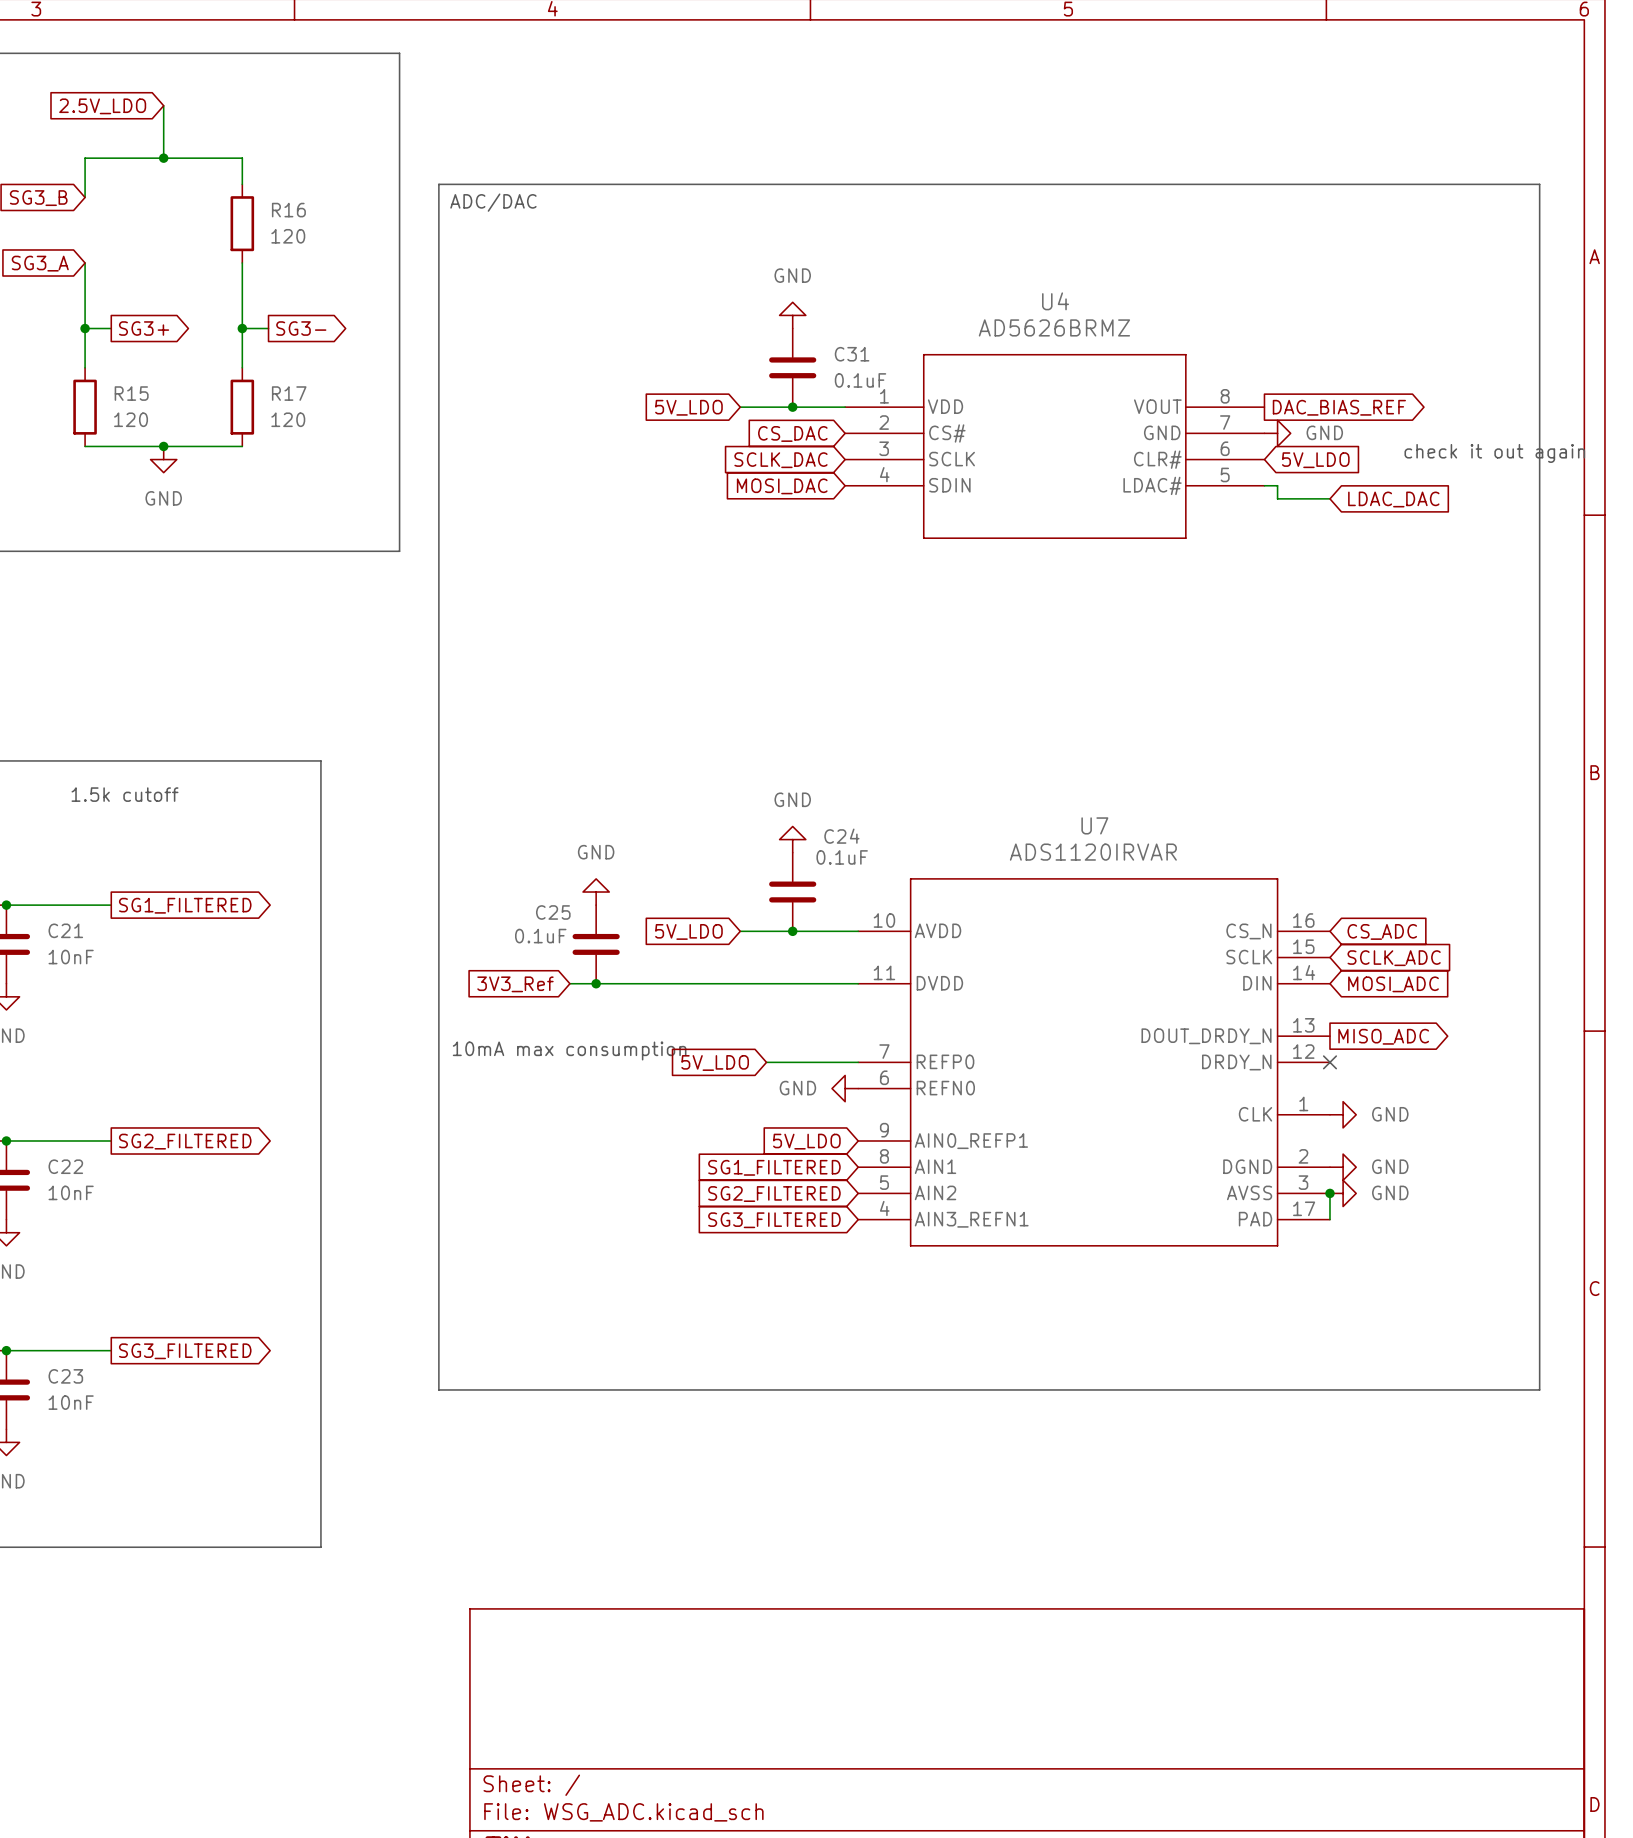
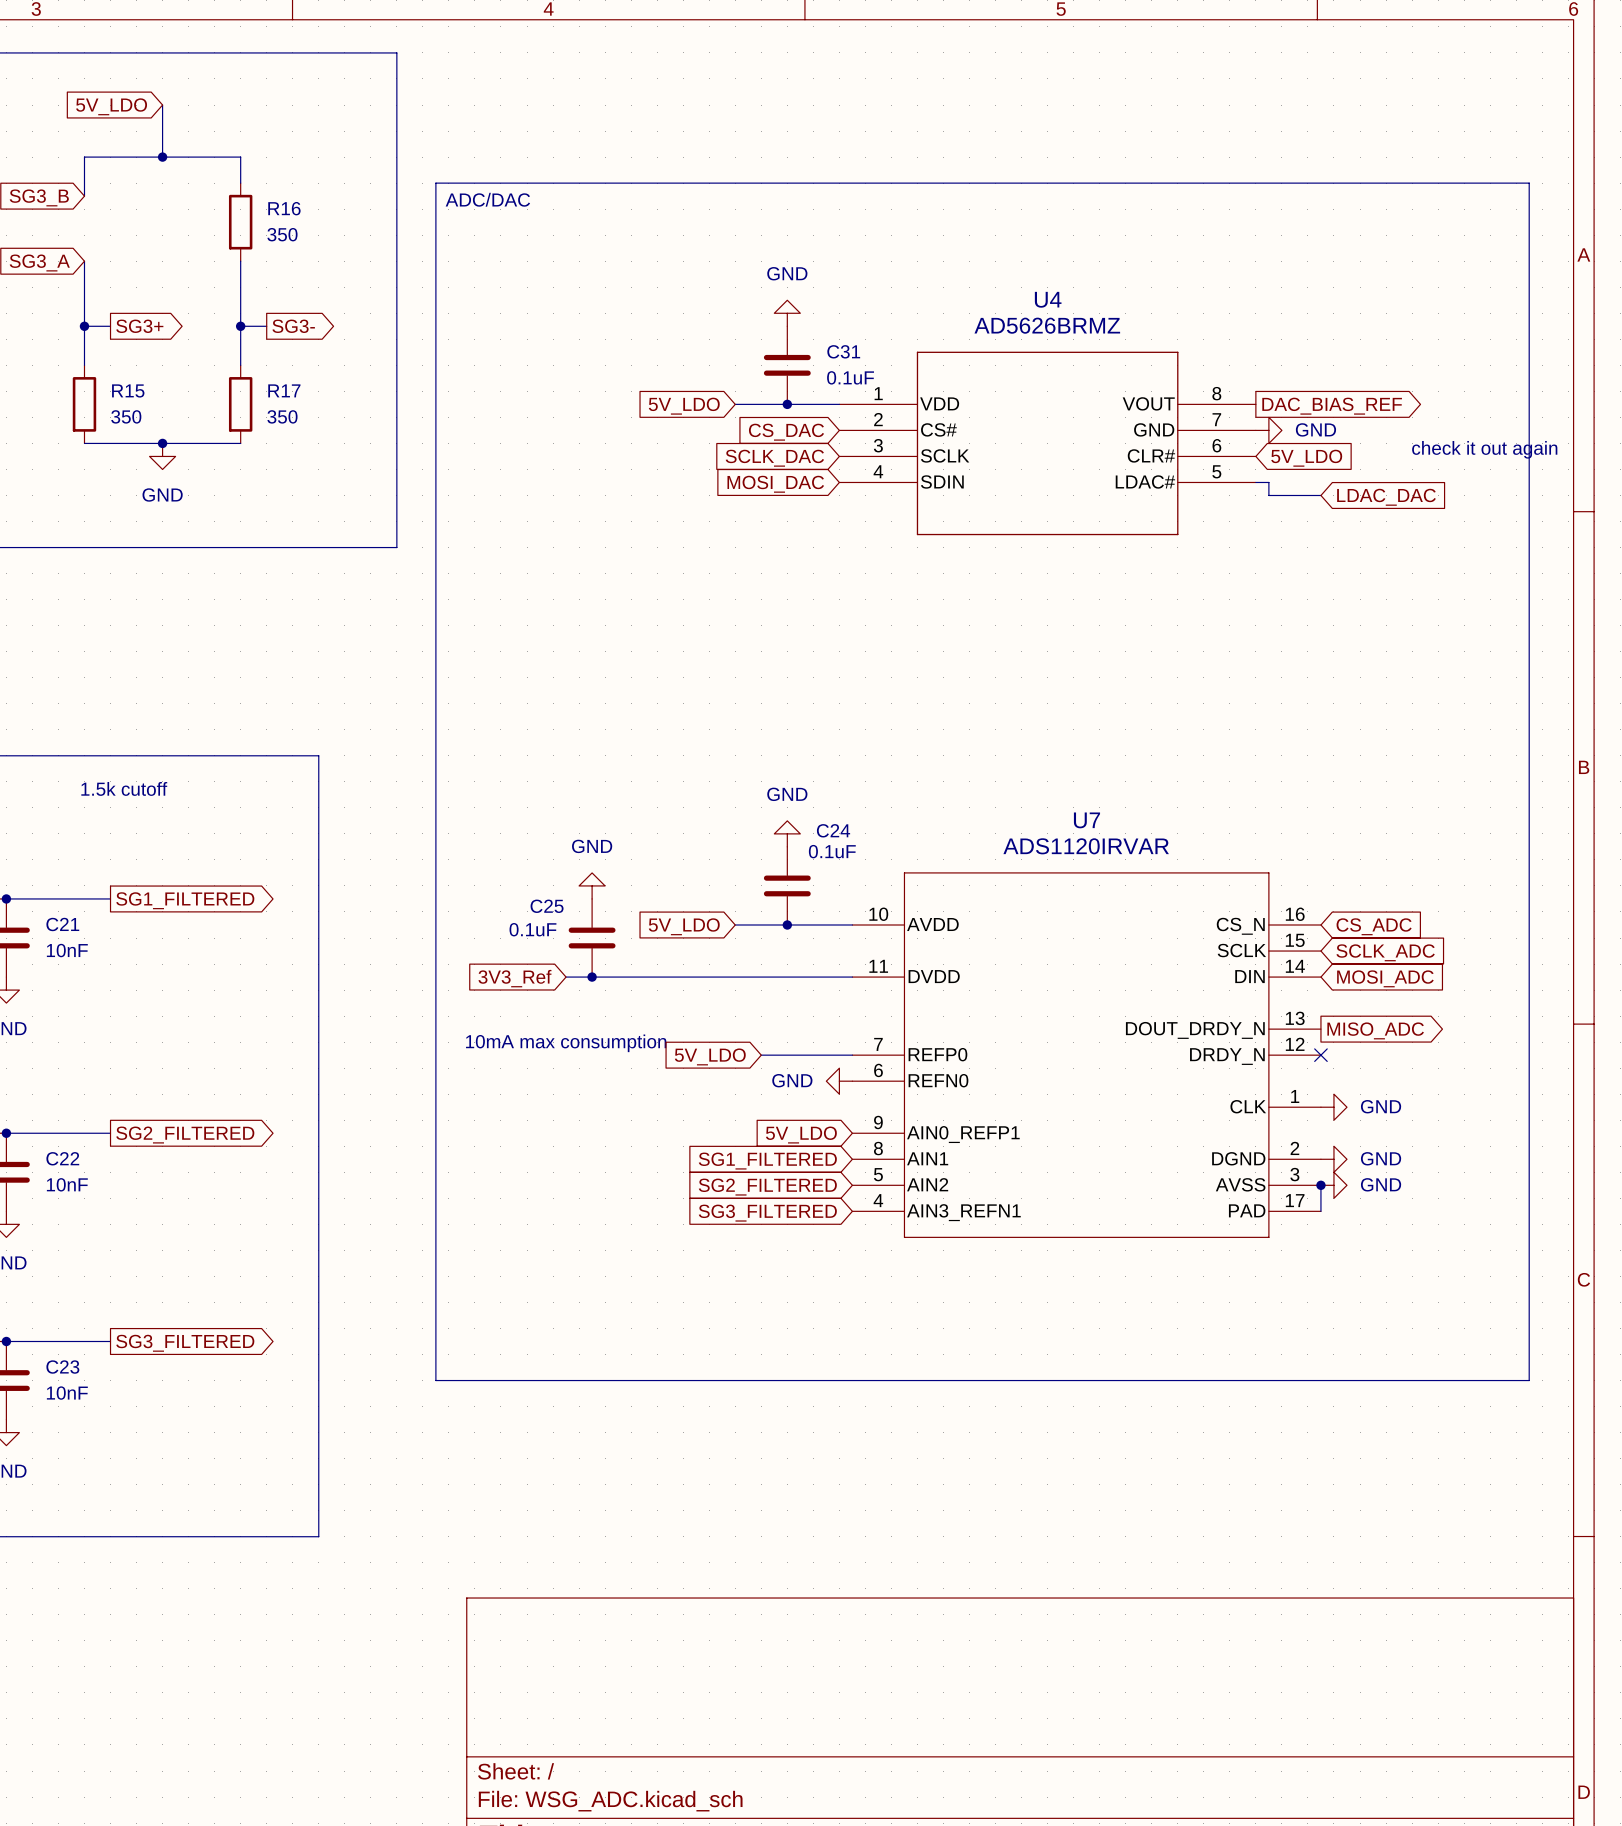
global label: 2.5V_LDO (102, 106) -> 5V_LDO (111, 106)
R16 value: 120 (288, 236) -> 350 (282, 234)
R15 value: 120 (131, 419) -> 350 (126, 416)
R17 value: 120 (288, 419) -> 350 (282, 416)

